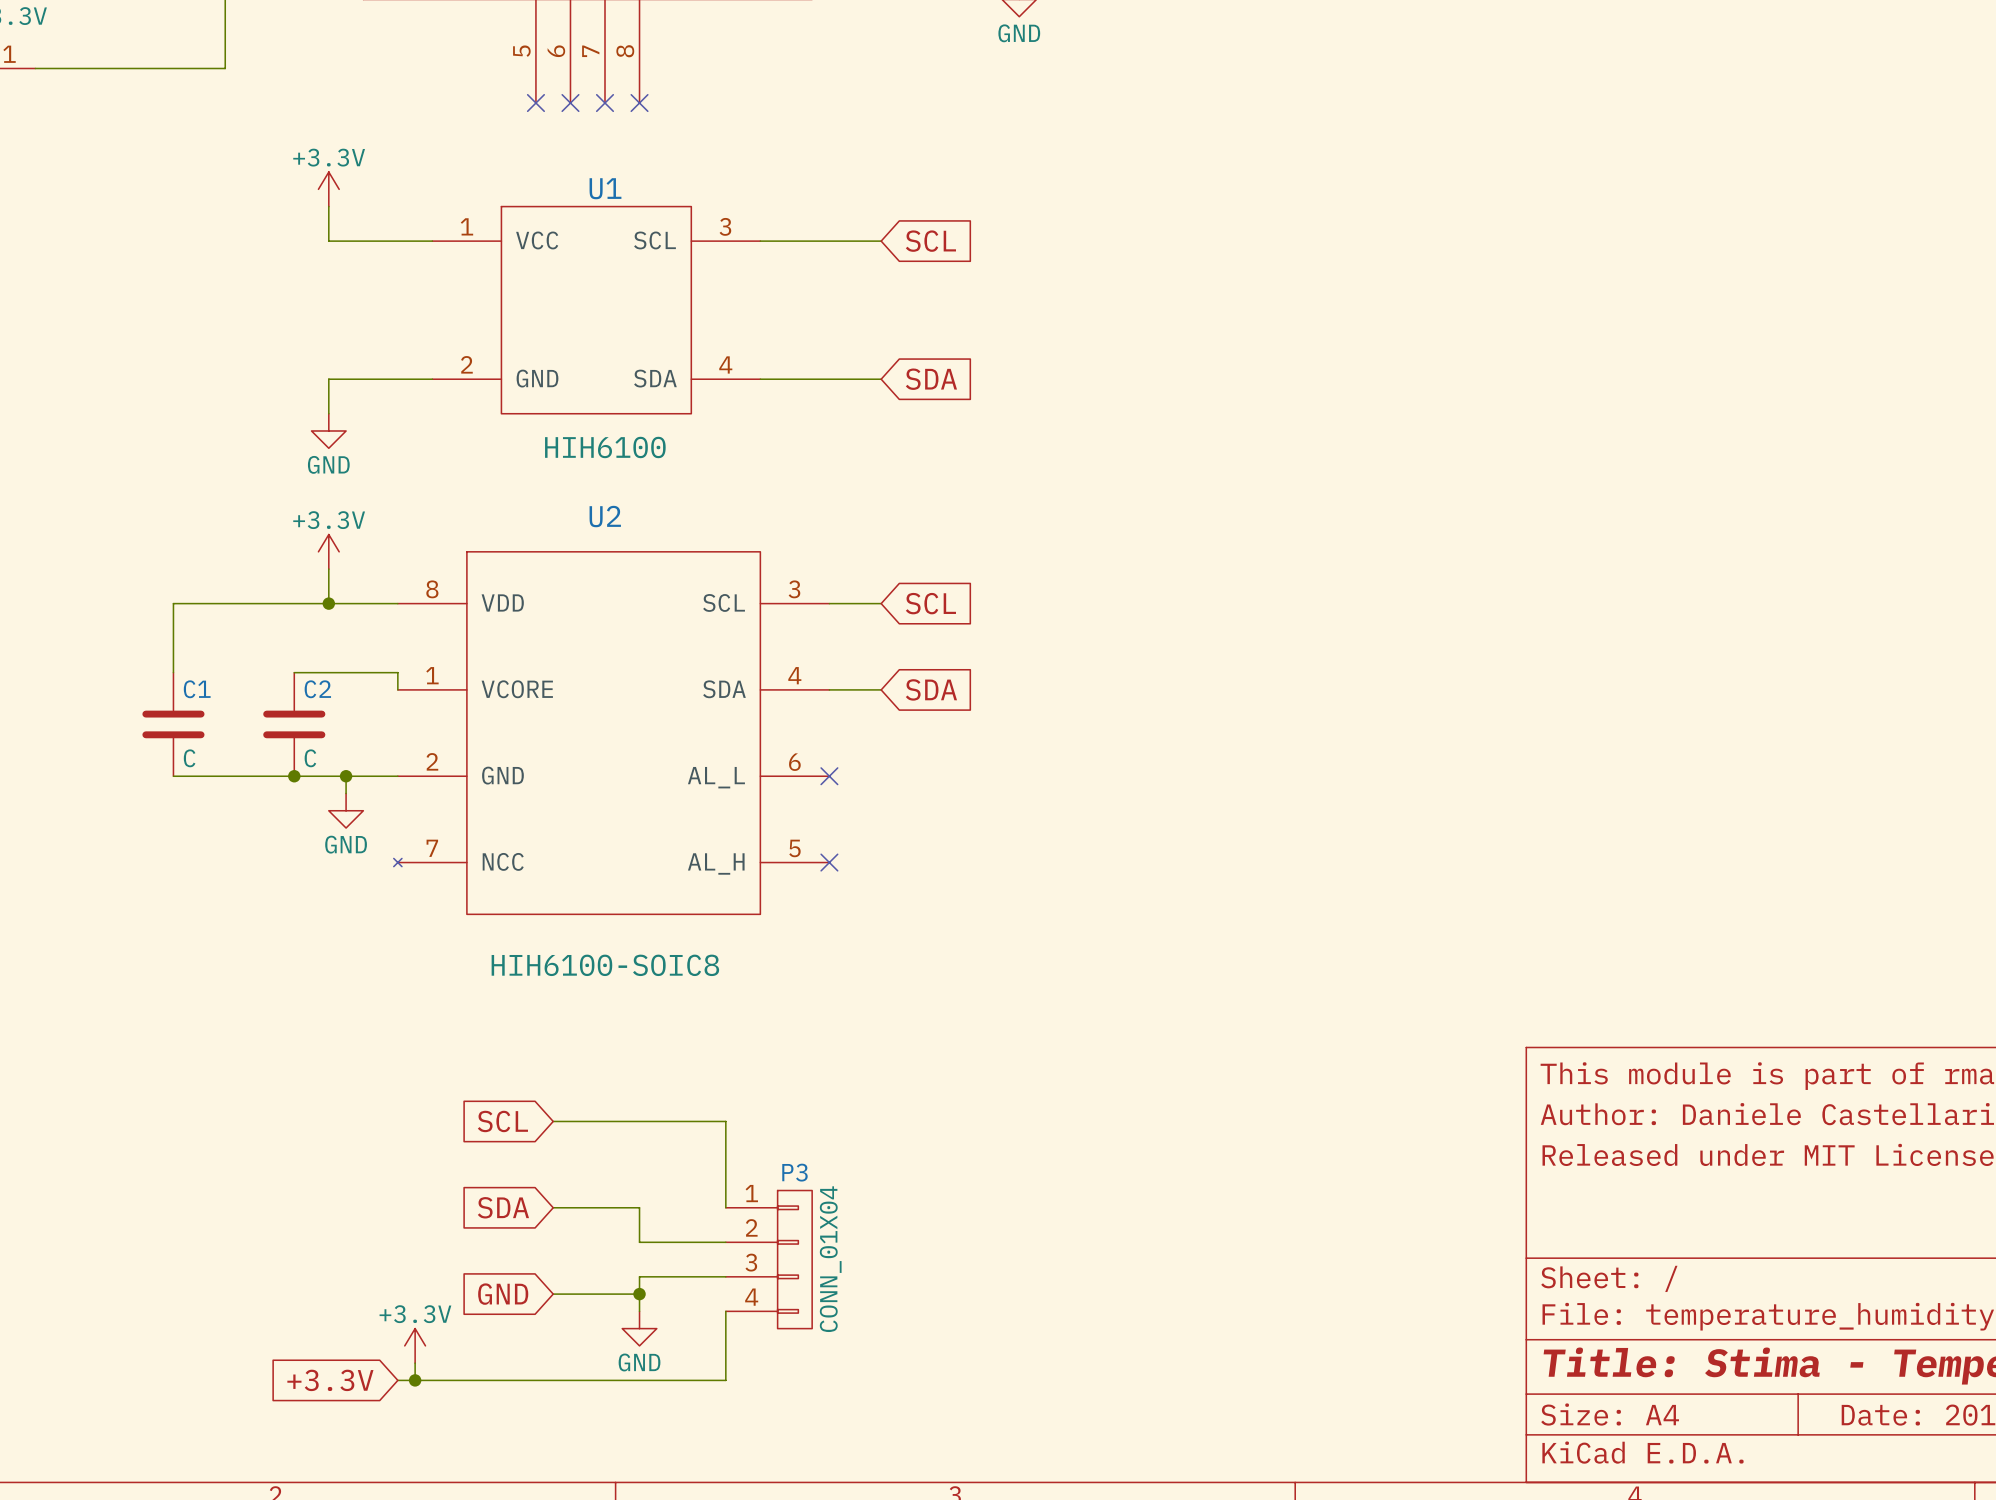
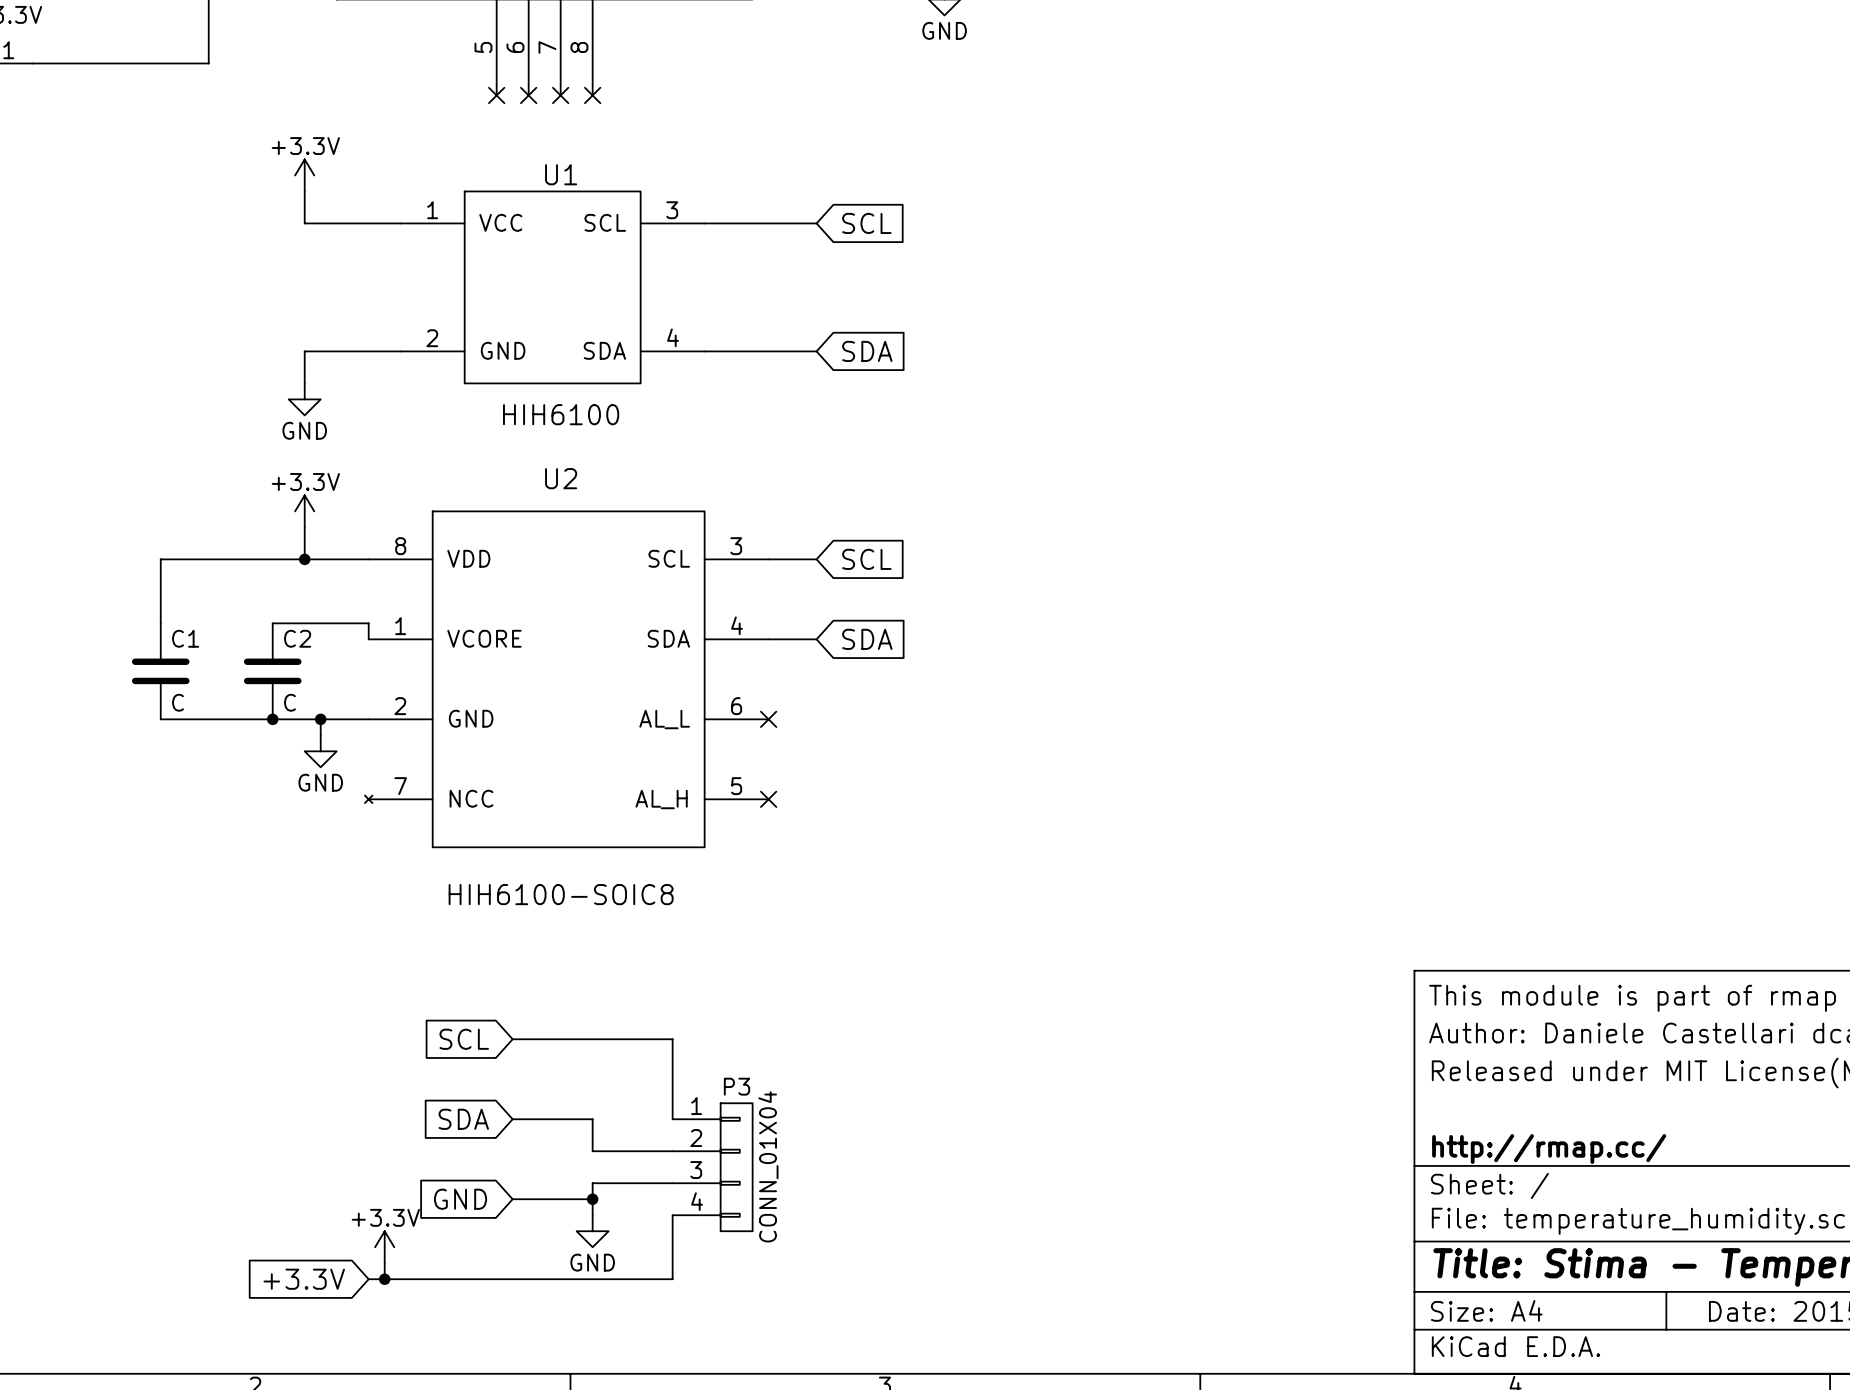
title block: none -> http://rmap.cc/ (1549, 1149)

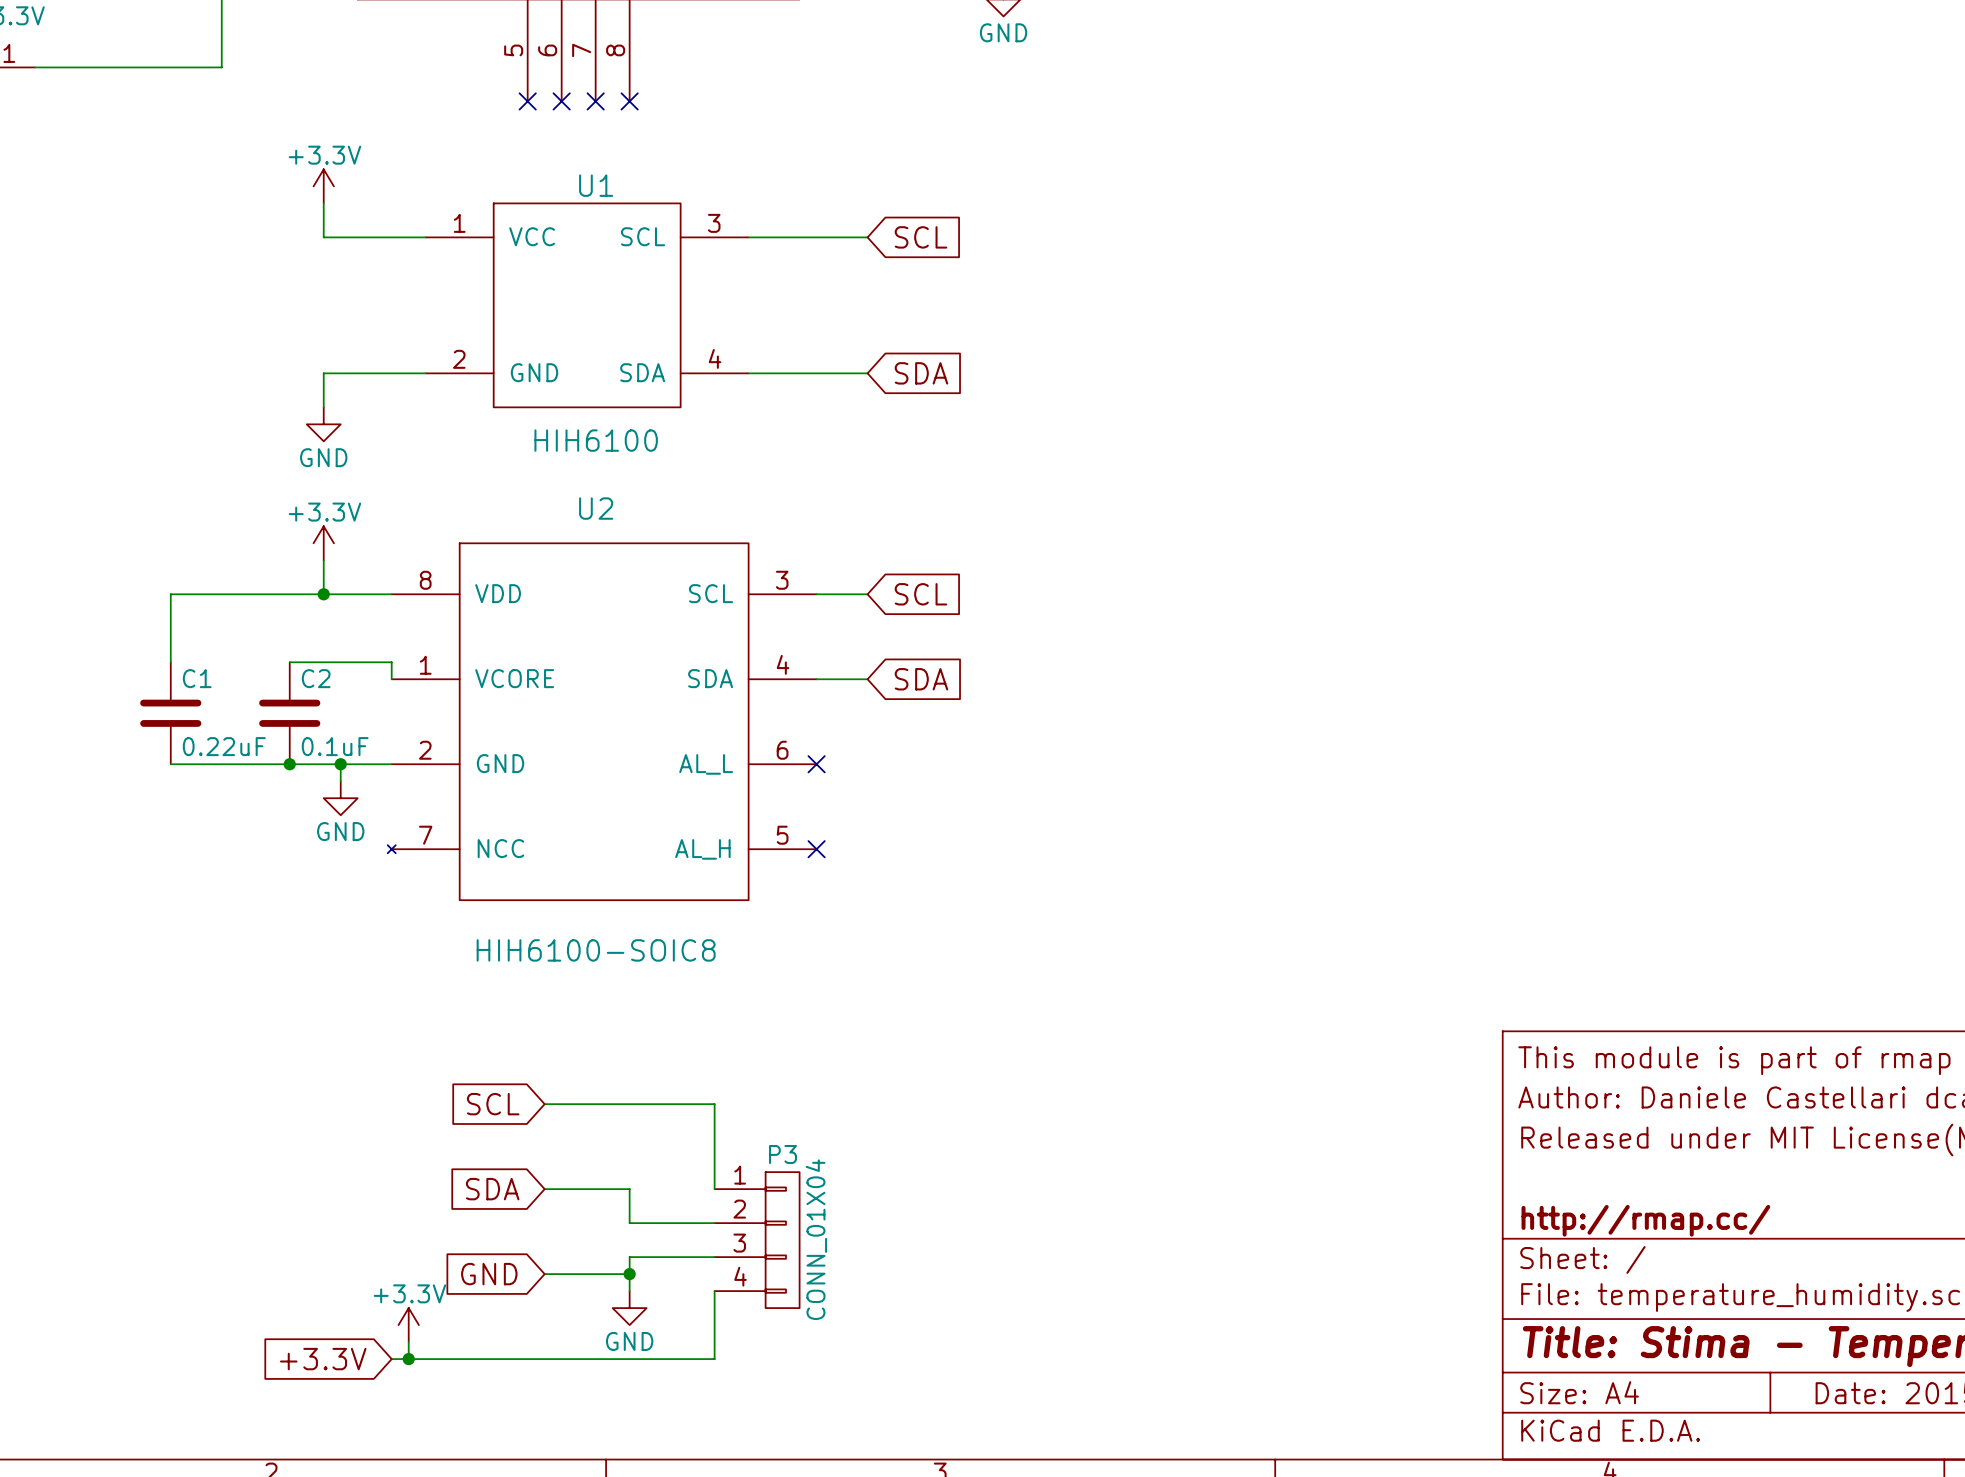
C1 value: C (178, 702) -> 0.22uF (224, 746)
C2 value: C (289, 702) -> 0.1uF (335, 746)

